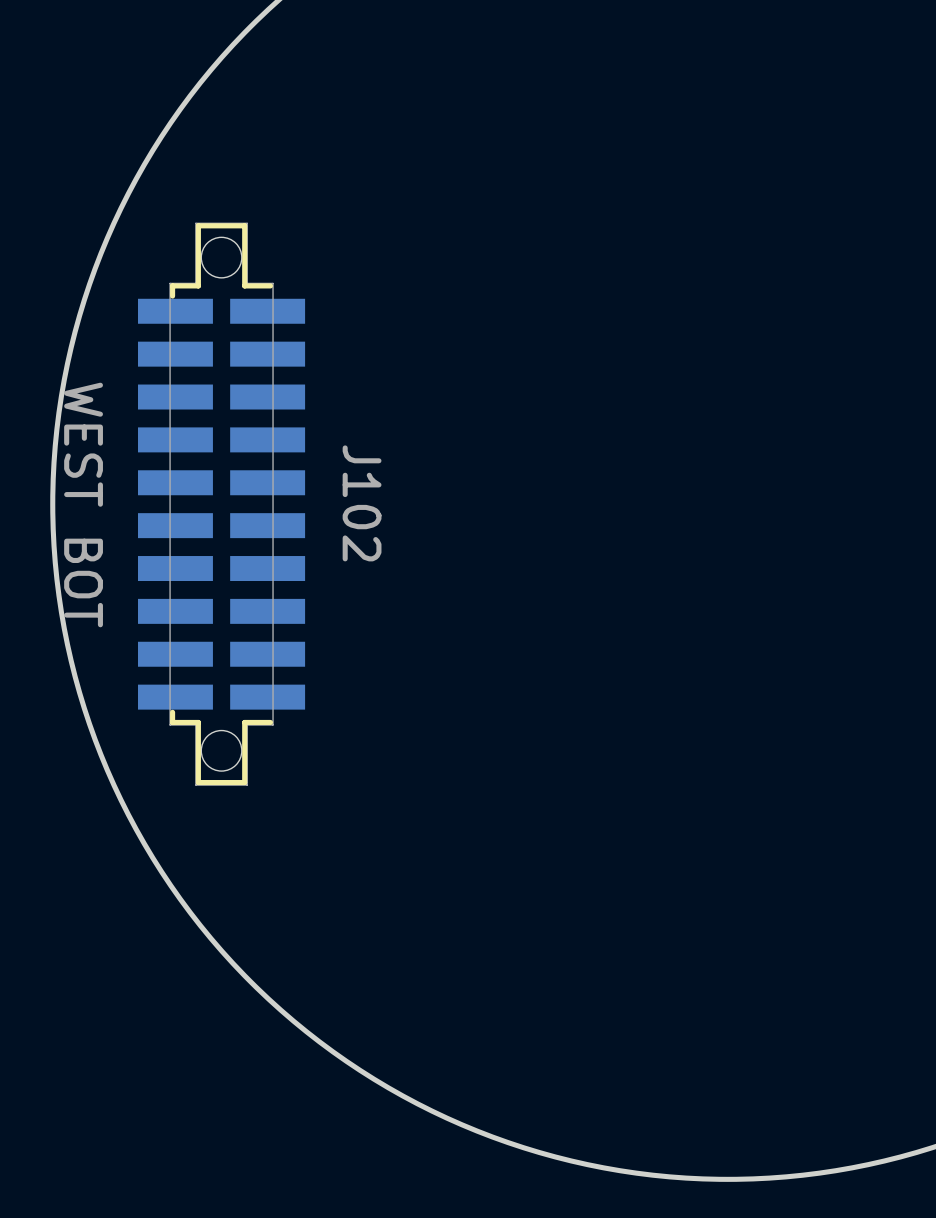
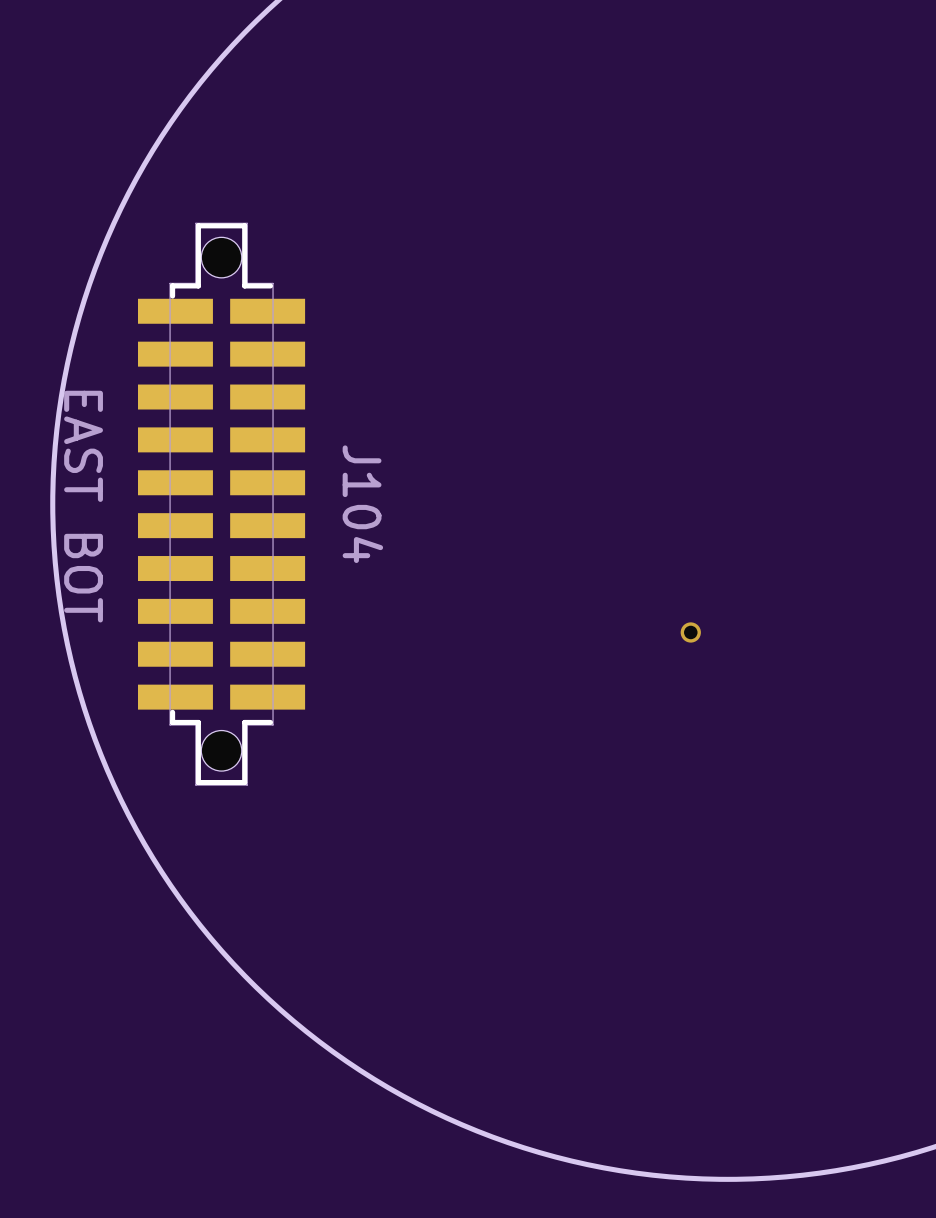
J102 name: J102 (362, 503) -> J104 (362, 504)
J102 value: WEST BOT (83, 505) -> EAST BOT (83, 506)
via: none -> (690, 632)

